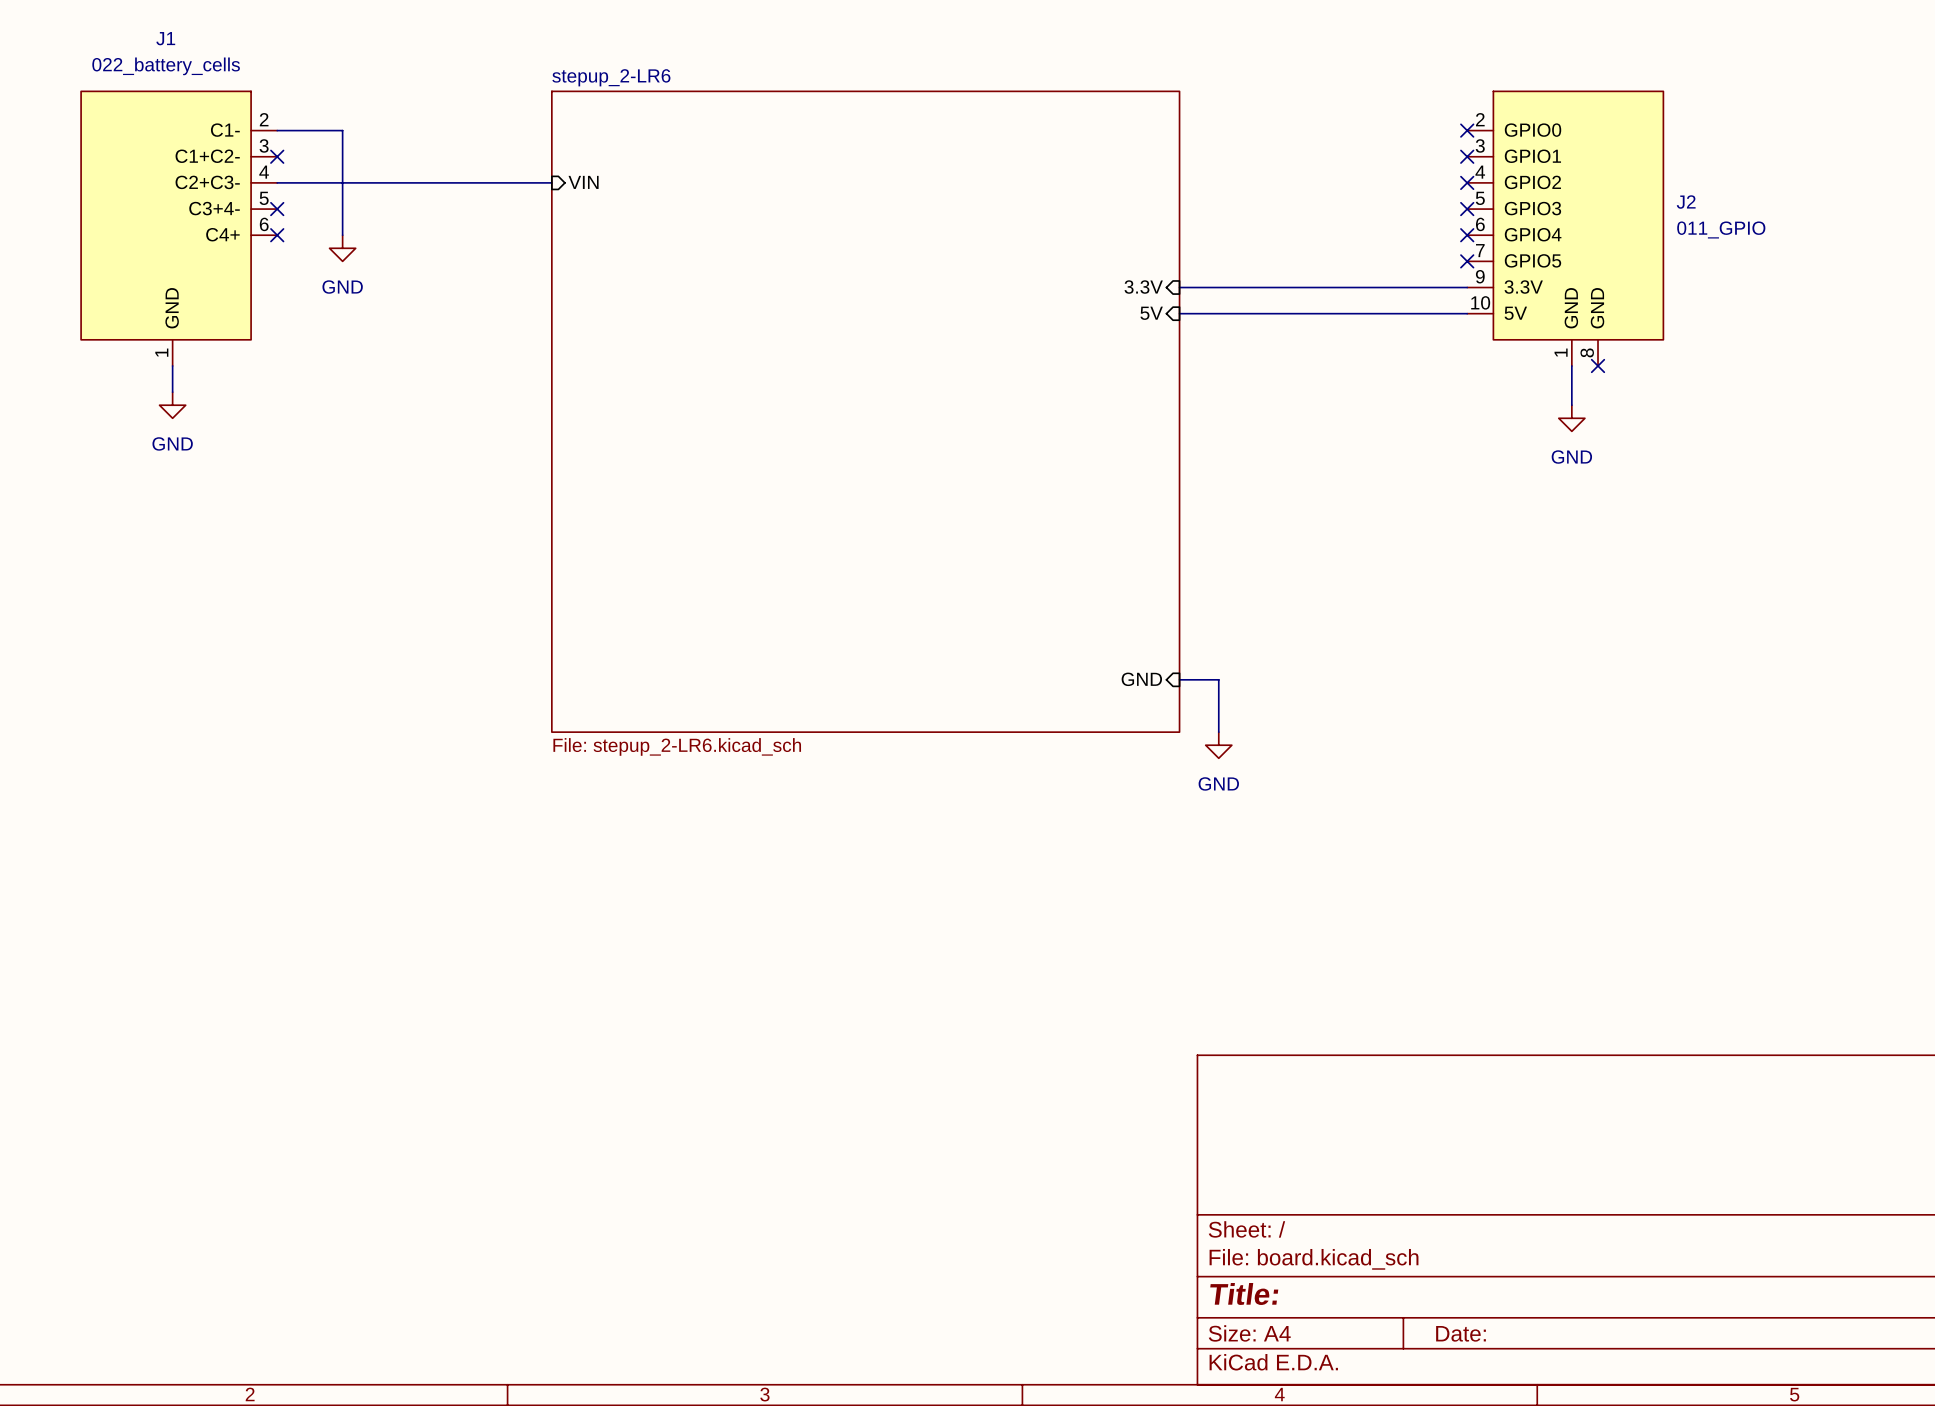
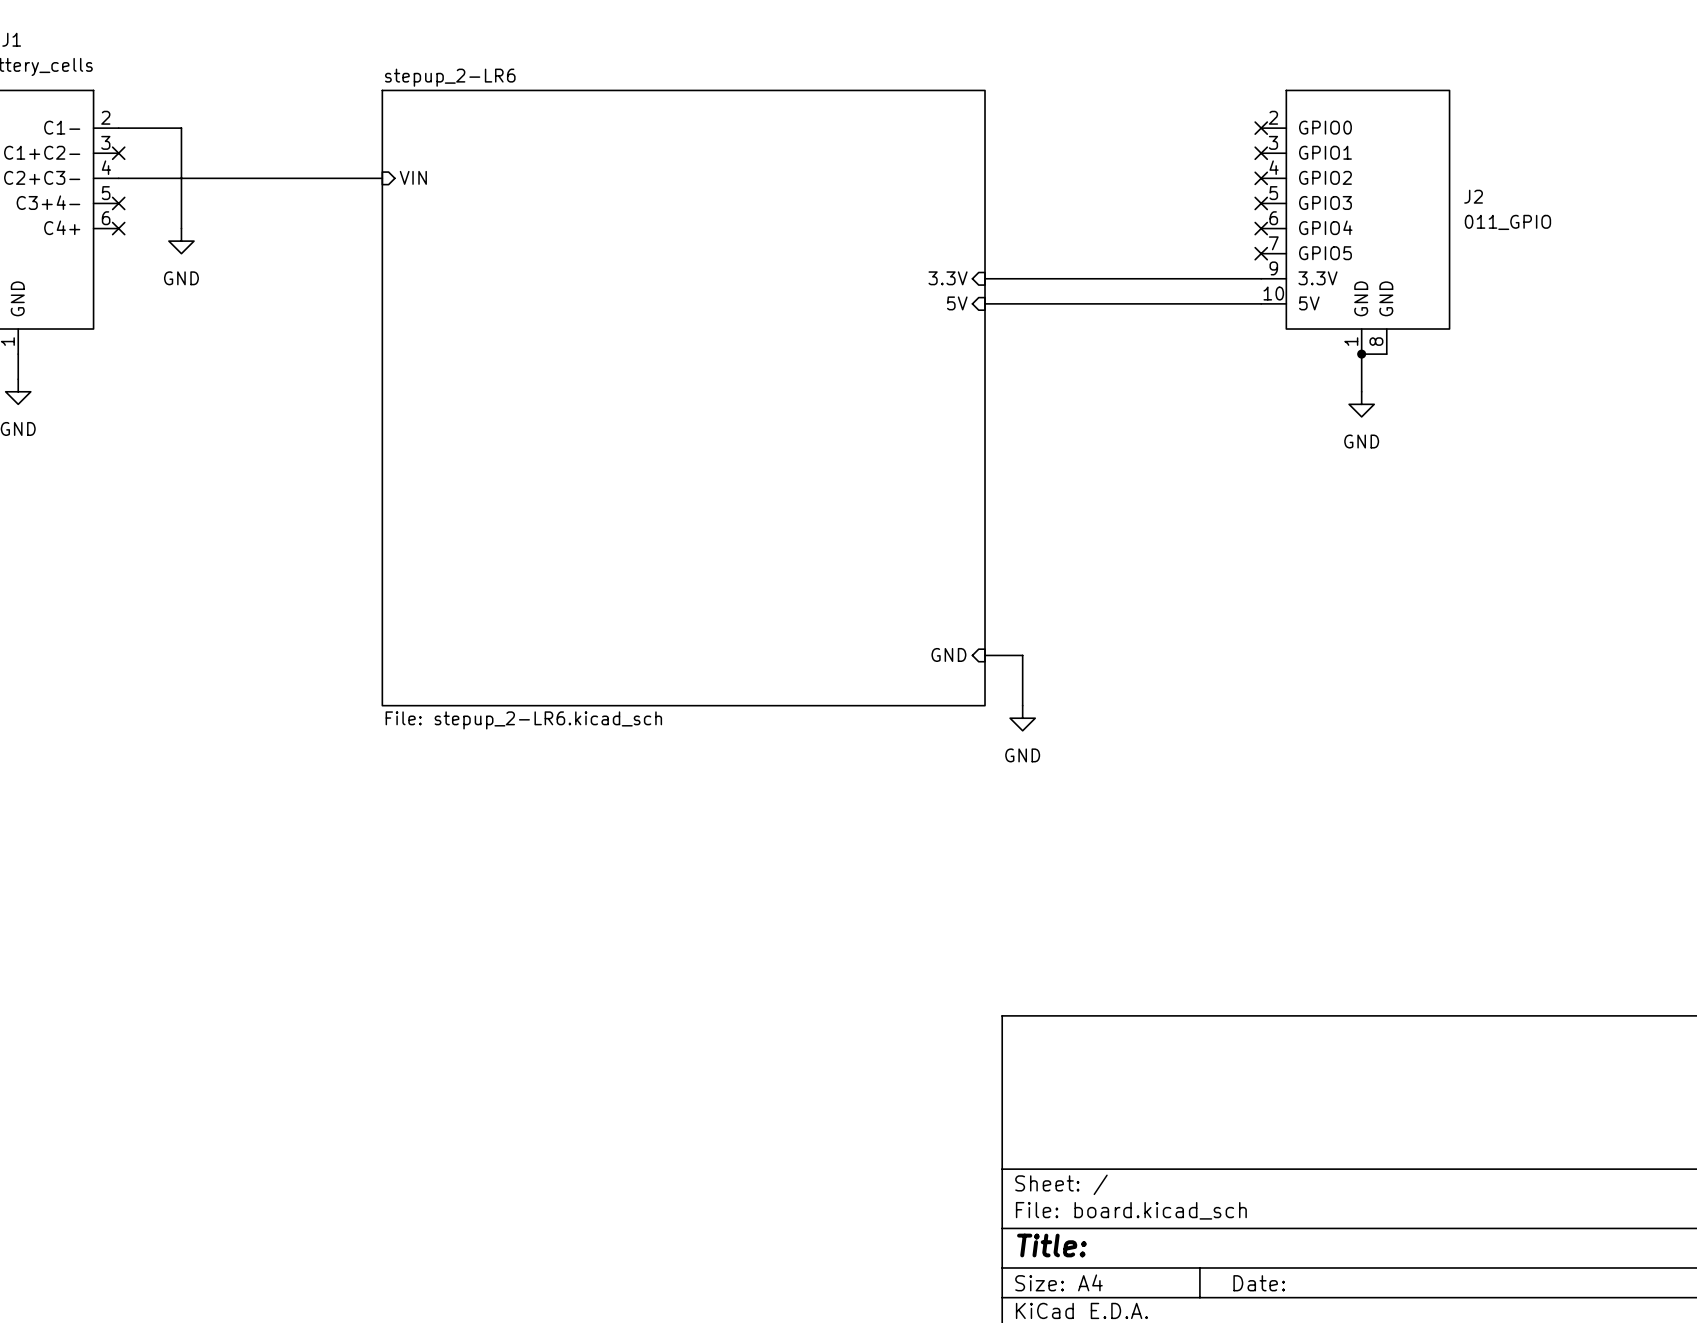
wire: none -> (1361, 354) (1386, 354)
junction: none -> (1361, 354)
no-connect mark: (1598, 365) -> none

